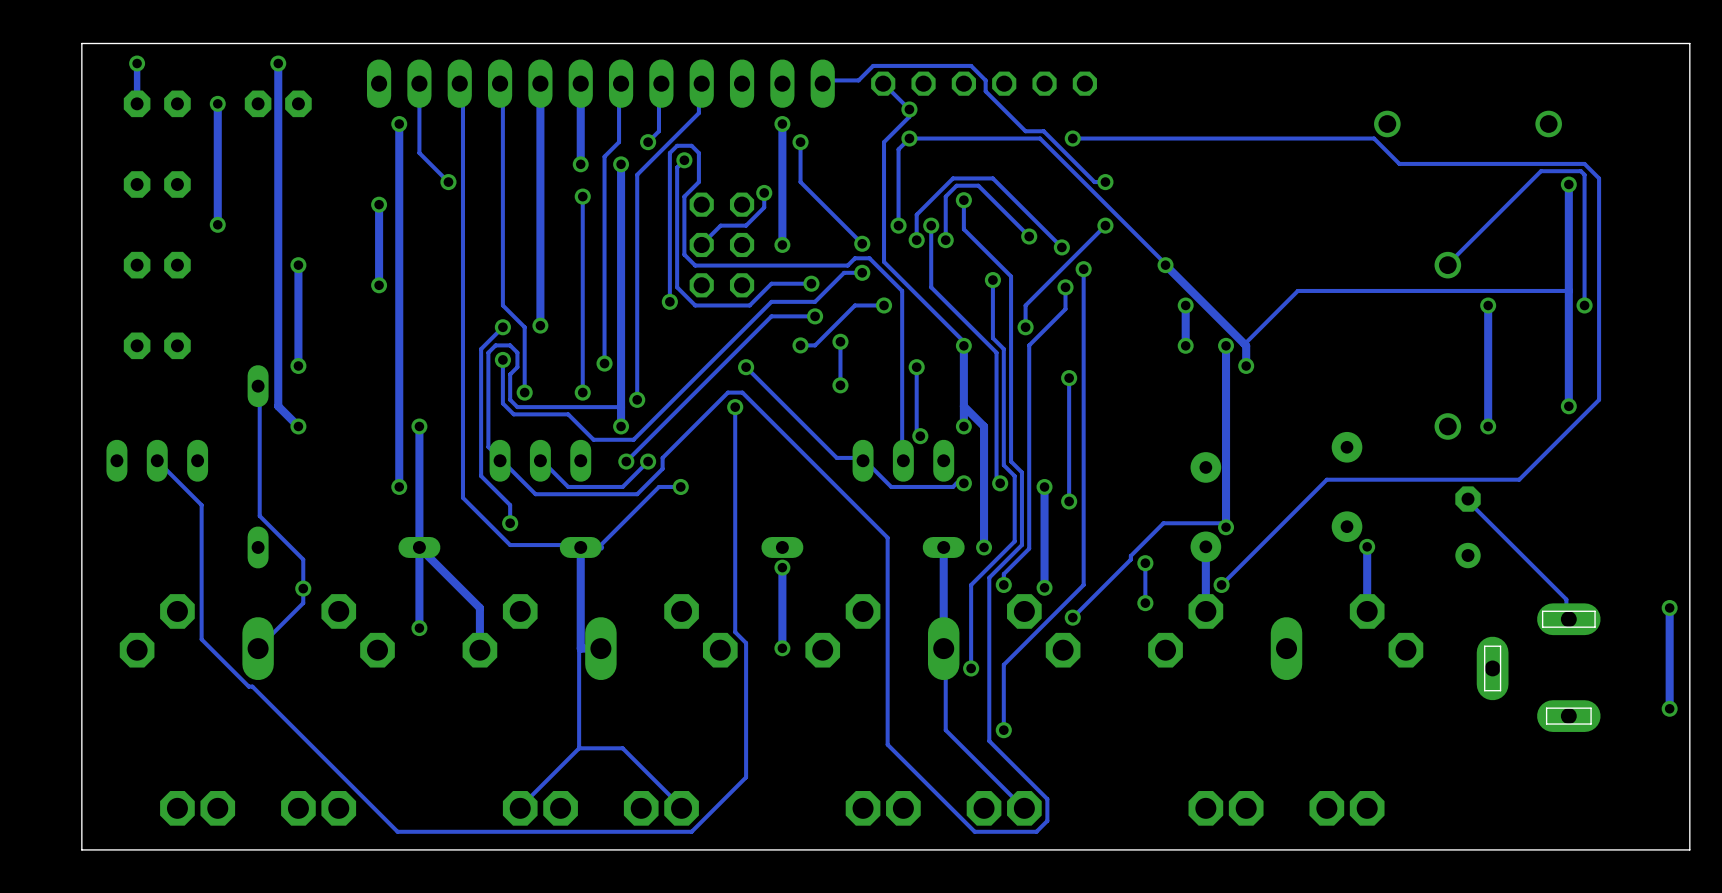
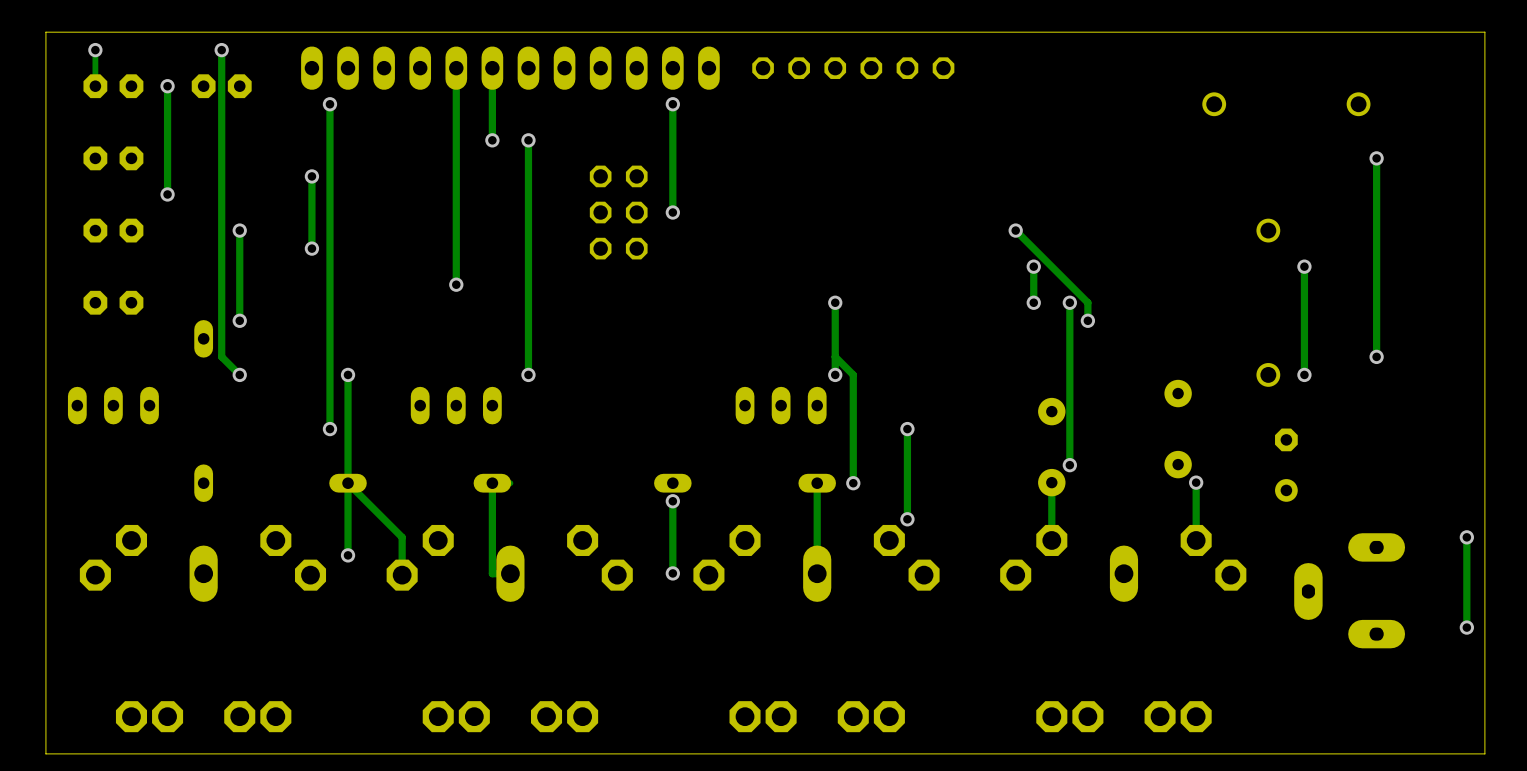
track: (419, 83) (419, 153) (448, 182) -> none
track: (459, 83) (462, 84) (462, 497) (510, 545) (579, 545) (580, 547) (600, 545) (658, 486) (680, 486) -> none
track: (500, 83) (502, 84) (502, 305) (524, 327) (524, 392) -> none
track: (621, 83) (619, 84) (619, 142) (604, 156) (604, 363) -> none
track: (661, 83) (658, 84) (658, 131) (648, 142) -> none
track: (701, 83) (698, 84) (698, 113) (637, 174) (637, 399) -> none
track: (822, 83) (825, 80) (858, 80) (873, 65) (971, 65) (985, 80) (985, 91) (1025, 131) (1043, 131) (1094, 182) (1105, 182) -> none
track: (883, 83) (909, 109) (909, 116) (884, 142) (884, 261) (967, 345) (963, 345) -> none
via: (909, 109) -> none
via: (909, 138) -> none
track: (1072, 138) (1374, 138) (1399, 163) (1584, 163) (1599, 178) (1599, 399) (1519, 479) (1326, 479) (1221, 584) -> none
via: (1072, 138) -> none
via: (648, 142) -> none
track: (800, 142) (800, 182) (862, 243) -> none
via: (800, 142) -> none
track: (684, 160) (677, 167) (677, 287) (695, 305) (749, 305) (771, 283) (811, 283) -> none
via: (684, 160) -> none
via: (448, 182) -> none
via: (1105, 182) -> none
track: (764, 192) (764, 207) (746, 225) (720, 225) (701, 244) -> none
via: (764, 192) -> none
track: (582, 196) (582, 392) -> none
via: (582, 196) -> none
track: (963, 200) (963, 229) (1011, 276) (1011, 461) (1021, 472) (1021, 545) (989, 577) (989, 741) (1047, 799) (1047, 820) (1036, 831) (974, 831) (887, 744) (887, 537) (742, 392) (727, 392) (662, 457) (662, 468) (637, 494) (535, 494) (488, 447) (488, 352) (495, 345) (510, 345) (517, 352) (517, 367) (510, 374) (510, 399) (517, 407) (621, 407) -> none
via: (963, 200) -> none
track: (898, 225) (898, 149) (909, 138) (1040, 138) (1165, 265) -> none
via: (898, 225) -> none
track: (931, 225) (931, 287) (996, 352) (996, 479) (1000, 483) -> none
via: (931, 225) -> none
track: (1105, 225) (1025, 305) (1025, 327) -> none
via: (1105, 225) -> none
track: (1029, 236) (978, 185) (956, 185) (945, 196) (945, 240) -> none
via: (1029, 236) -> none
track: (916, 240) (916, 214) (952, 178) (992, 178) (1061, 247) -> none
via: (916, 240) -> none
via: (945, 240) -> none
via: (862, 243) -> none
via: (1061, 247) -> none
track: (1447, 265) (1541, 171) (1580, 171) (1584, 174) (1584, 305) -> none
track: (1083, 269) (1083, 584) (1003, 664) (1003, 730) -> none
via: (1083, 269) -> none
track: (862, 272) (844, 272) (815, 301) (771, 301) (633, 439) (593, 439) (568, 414) (513, 414) (502, 403) (502, 359) -> none
via: (862, 272) -> none
track: (992, 280) (992, 338) (1003, 349) (1003, 465) (1014, 476) (1014, 541) (971, 584) (971, 668) -> none
via: (992, 280) -> none
via: (811, 283) -> none
track: (1065, 287) (1065, 309) (1029, 345) (1029, 548) (1003, 574) (1003, 584) -> none
via: (1065, 287) -> none
track: (1568, 290) (1297, 290) (1244, 344) -> none
track: (669, 301) (669, 153) (677, 145) (691, 145) (698, 153) (698, 182) (684, 196) (684, 254) (695, 265) (847, 265) (854, 258) (869, 258) (902, 290) (903, 460) -> none
via: (669, 301) -> none
track: (884, 305) (854, 305) (815, 345) (800, 345) -> none
via: (884, 305) -> none
via: (1584, 305) -> none
track: (815, 316) (771, 316) (626, 461) -> none
via: (815, 316) -> none
track: (502, 327) (481, 349) (481, 476) (510, 505) (510, 523) -> none
via: (502, 327) -> none
via: (1025, 327) -> none
track: (840, 341) (840, 385) -> none
via: (840, 341) -> none
via: (800, 345) -> none
via: (502, 359) -> none
via: (604, 363) -> none
track: (746, 367) (836, 457) (862, 457) (891, 486) (952, 486) (956, 483) (963, 483) -> none
via: (746, 367) -> none
track: (916, 367) (916, 432) (920, 436) -> none
via: (916, 367) -> none
track: (1069, 378) (1069, 501) -> none
via: (1069, 378) -> none
via: (840, 385) -> none
track: (258, 386) (259, 388) (259, 516) (303, 559) (303, 603) (258, 648) -> none
via: (524, 392) -> none
via: (582, 392) -> none
via: (637, 399) -> none
track: (735, 407) (735, 632) (746, 643) (746, 777) (691, 831) (397, 831) (252, 686) (248, 686) (201, 639) (201, 505) (157, 460) -> none
via: (735, 407) -> none
via: (920, 436) -> none
track: (540, 460) (568, 486) (622, 486) (648, 461) -> none
via: (626, 461) -> none
via: (648, 461) -> none
via: (963, 483) -> none
via: (1000, 483) -> none
via: (680, 486) -> none
track: (1468, 499) (1566, 599) (1566, 617) (1568, 619) -> none
via: (1069, 501) -> none
via: (510, 523) -> none
track: (1226, 527) (1225, 523) (1163, 523) (1130, 555) (1130, 559) (1072, 617) -> none
track: (1145, 563) (1145, 603) -> none
via: (1145, 563) -> none
via: (1003, 584) -> none
via: (1221, 584) -> none
via: (303, 588) -> none
via: (1145, 603) -> none
via: (1072, 617) -> none
track: (580, 648) (579, 650) (579, 748) -> none
track: (943, 648) (945, 650) (945, 730) (1024, 808) -> none
via: (971, 668) -> none
via: (1003, 730) -> none
track: (579, 748) (520, 808) -> none
track: (579, 748) (622, 748) (681, 808) -> none

